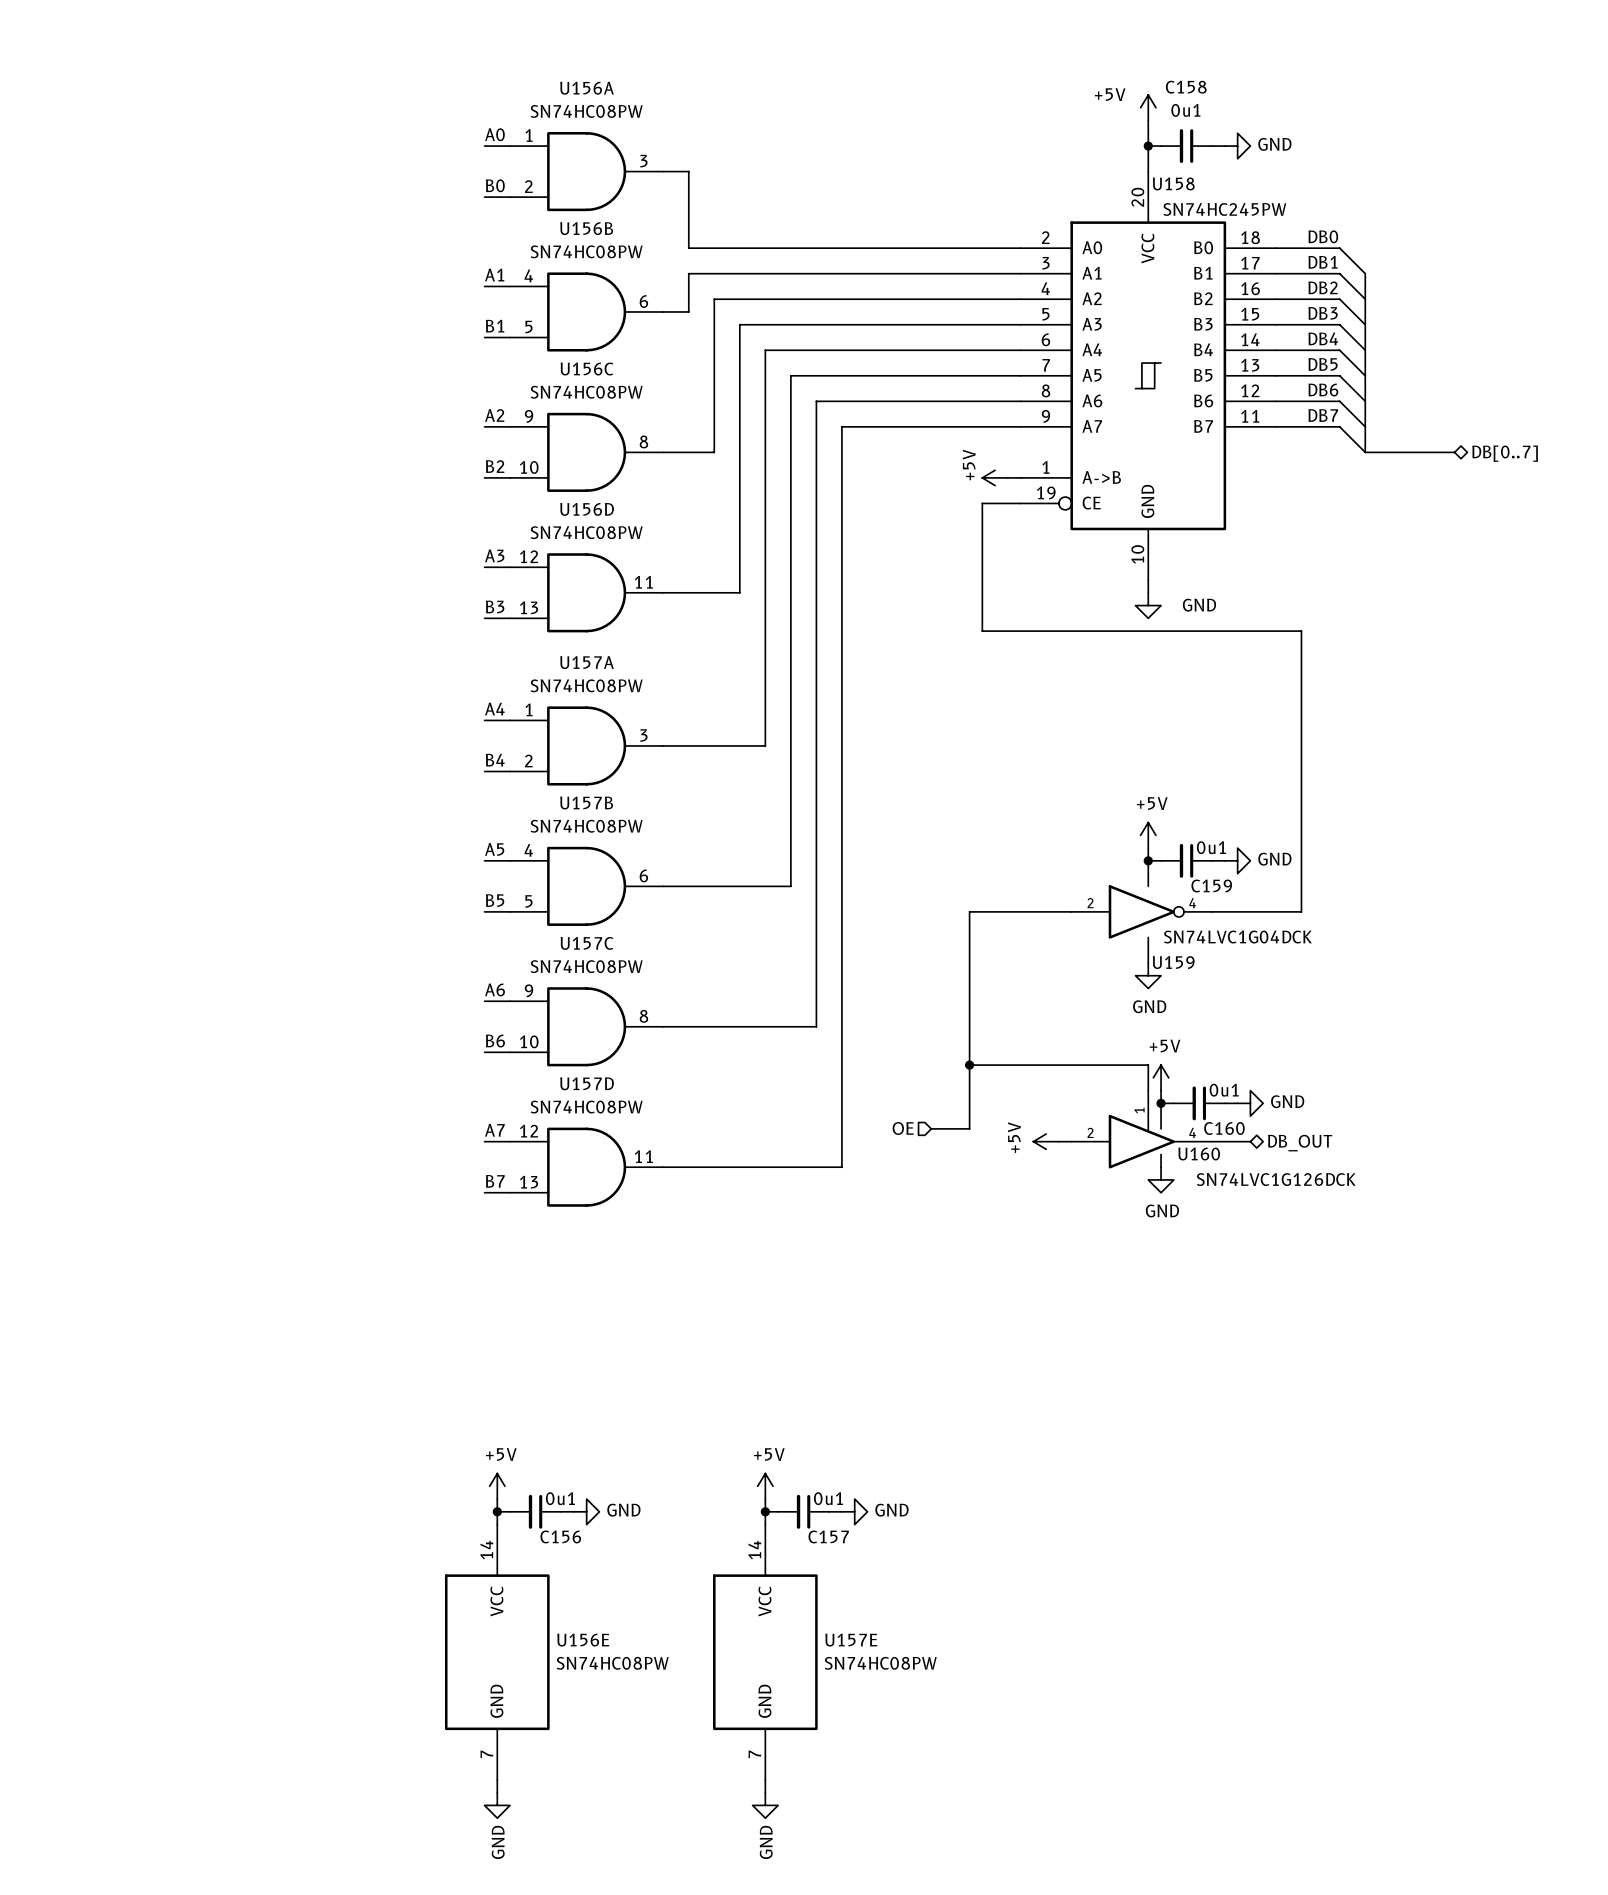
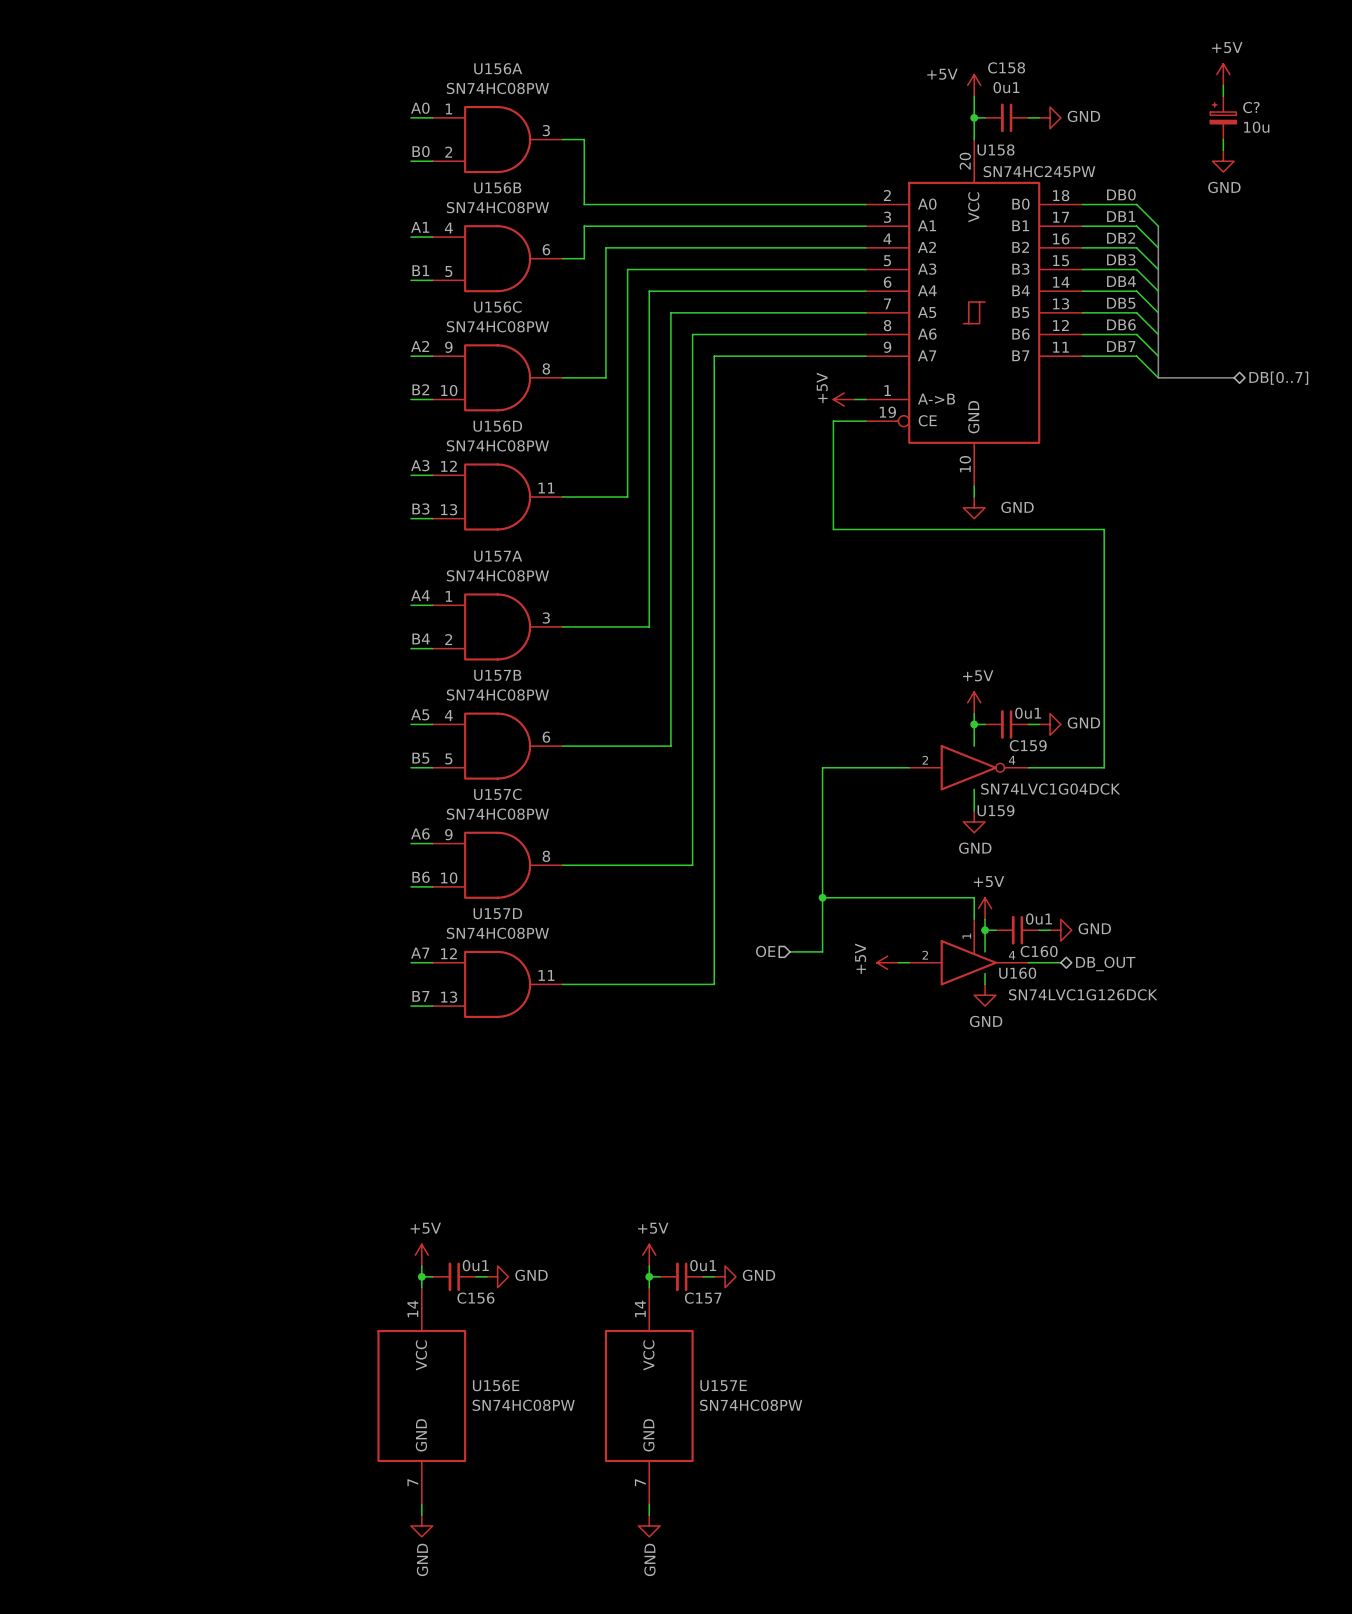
power symbol: none -> +5V (1223, 74)
wire: none -> (1223, 85) (1223, 96)
C?: none -> 10u (1223, 117)
wire: none -> (1223, 139) (1223, 150)
power symbol: none -> GND (1223, 161)

